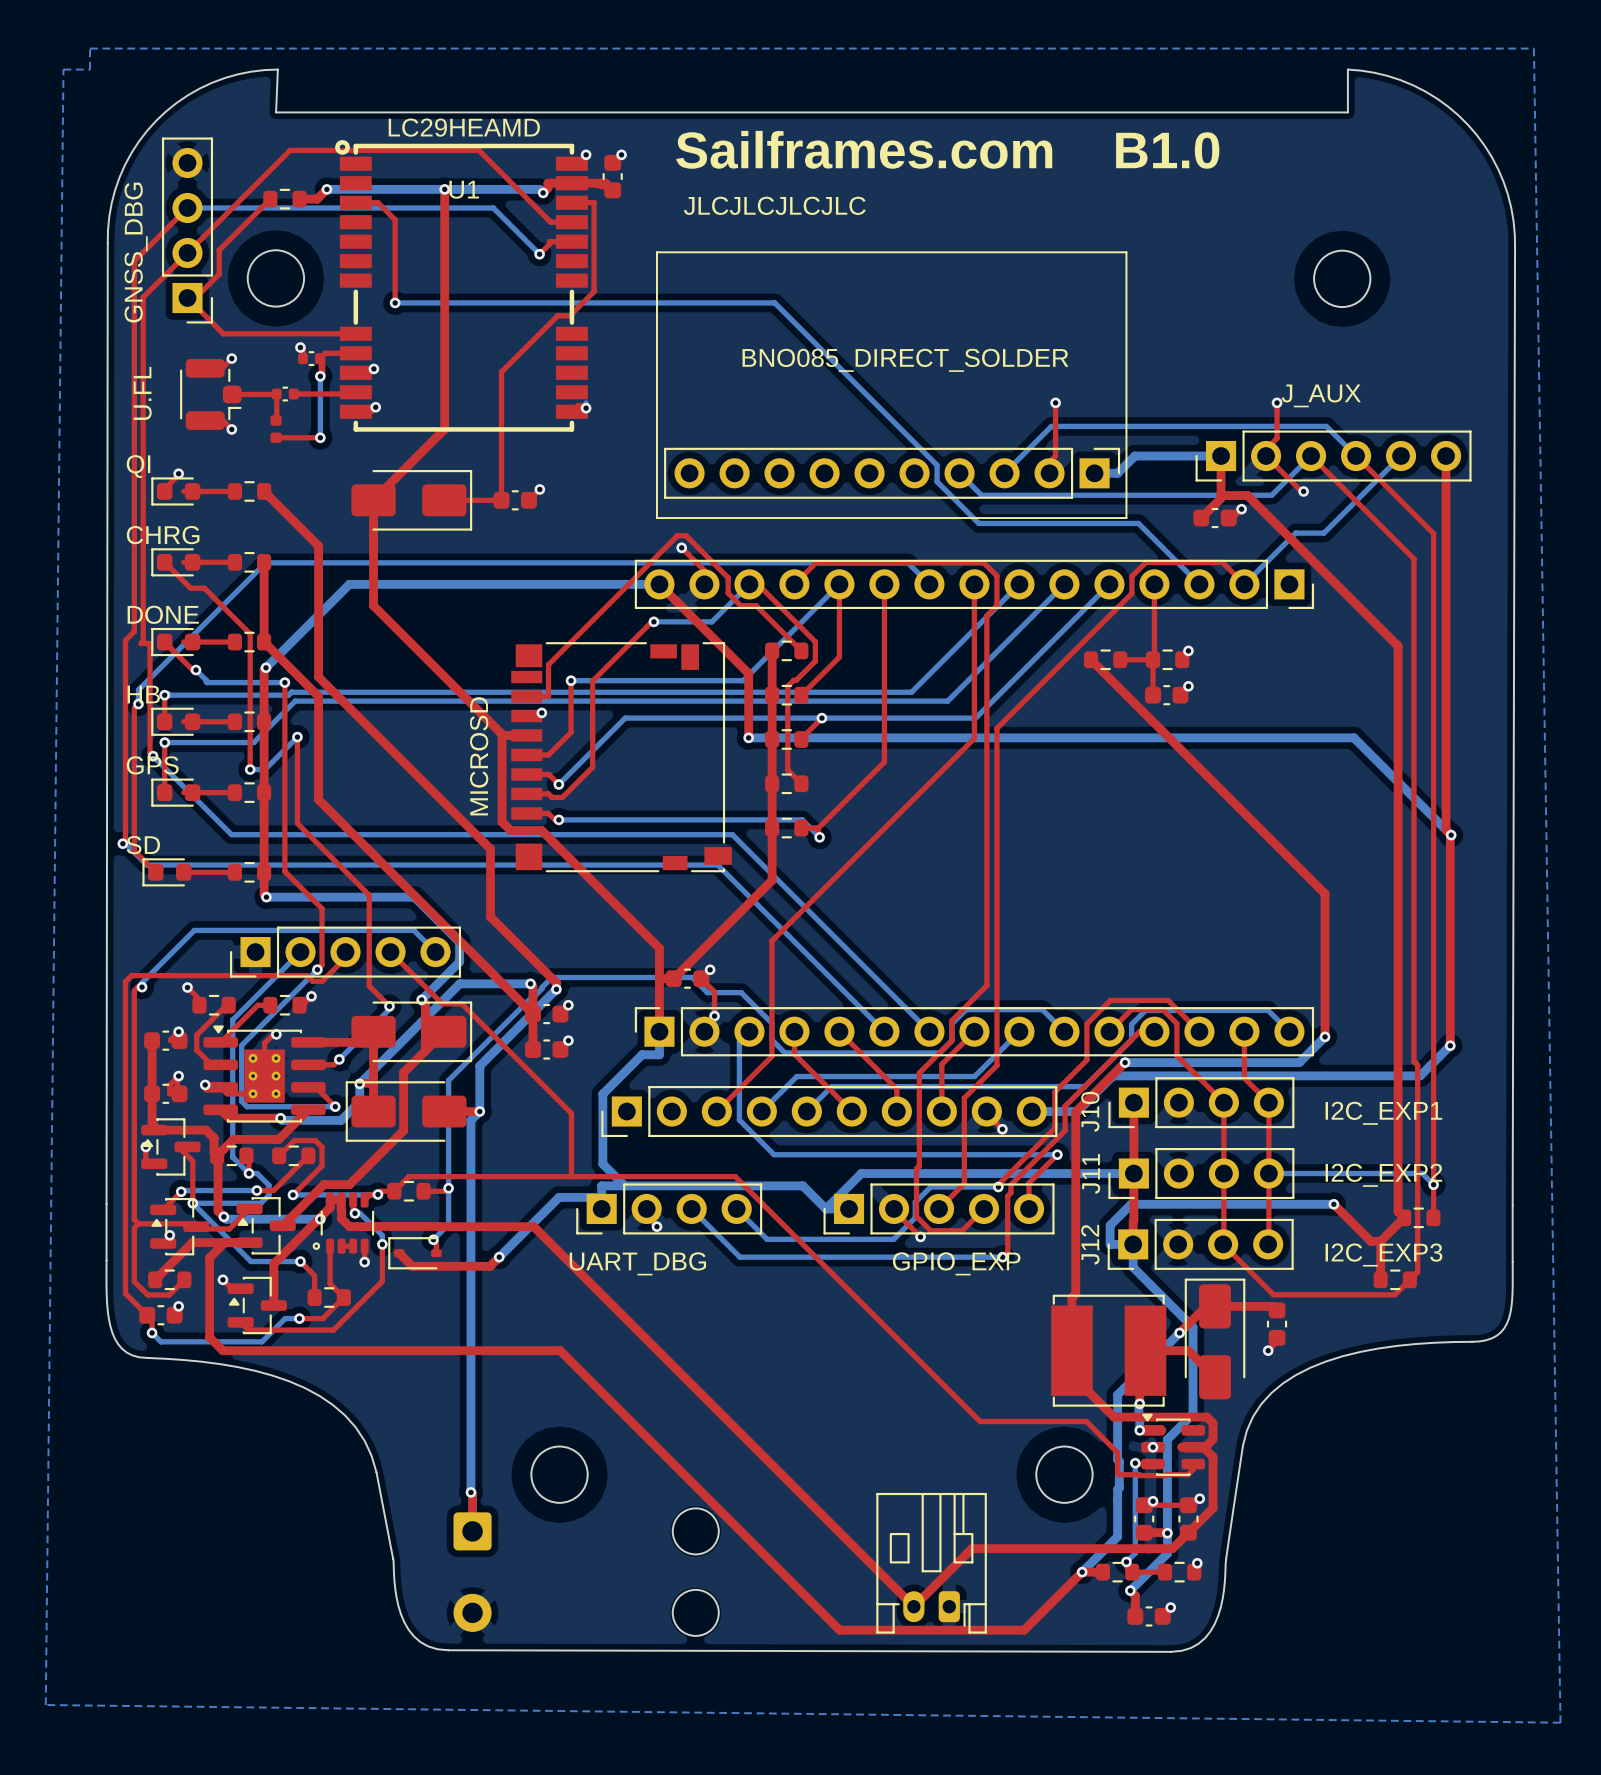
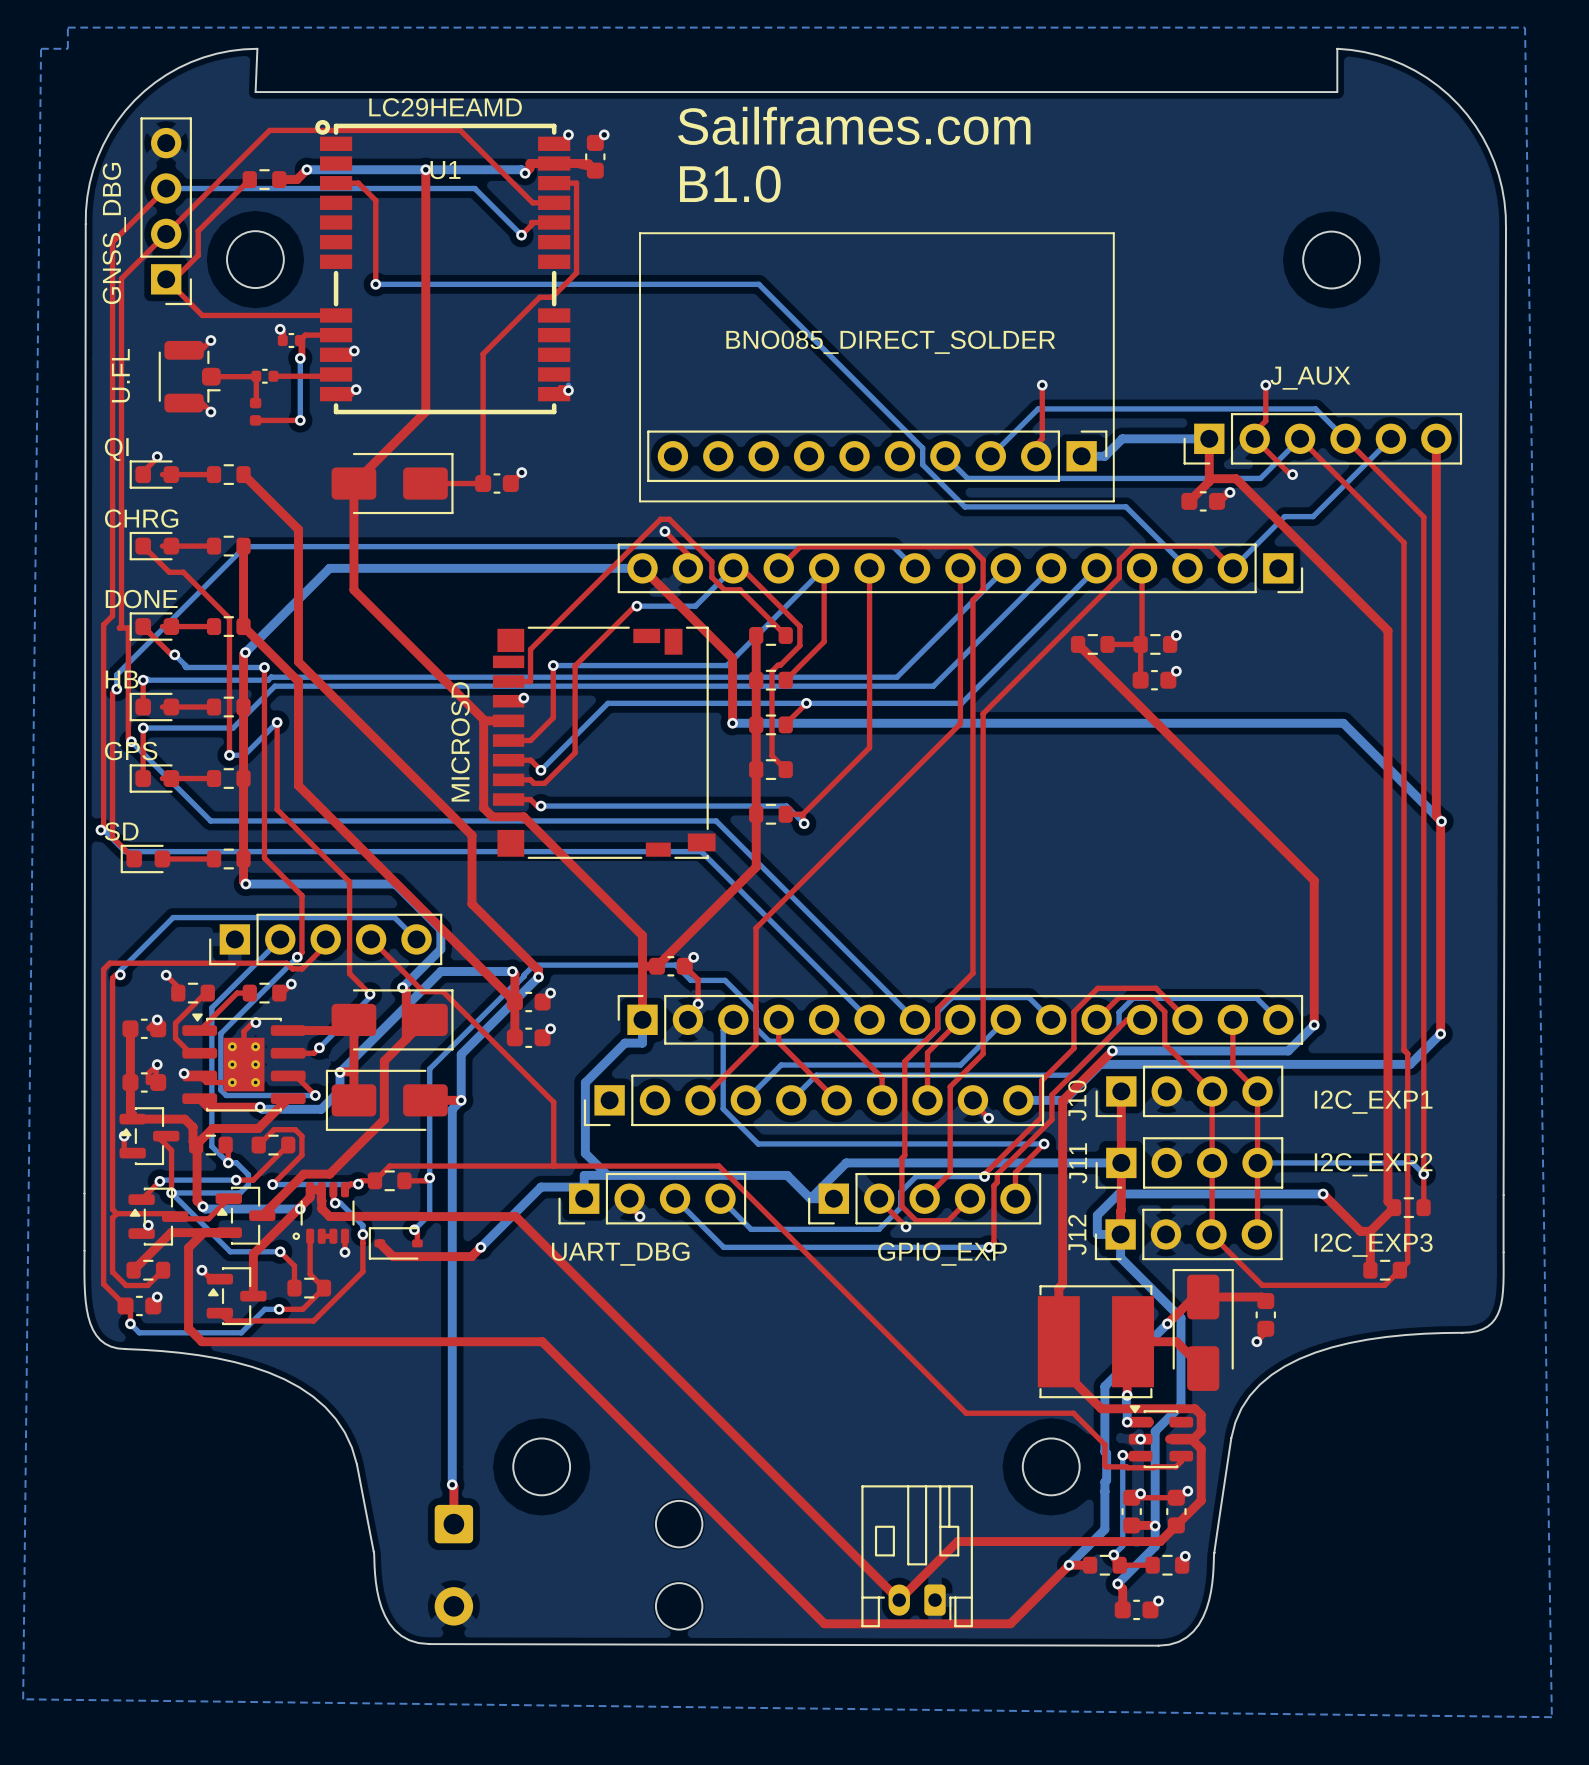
text: Sailframes.com B1.0 (947, 149) -> Sailframes.com (854, 125)
text: JLCJLCJLCJLC (774, 205) -> B1.0 (730, 184)

